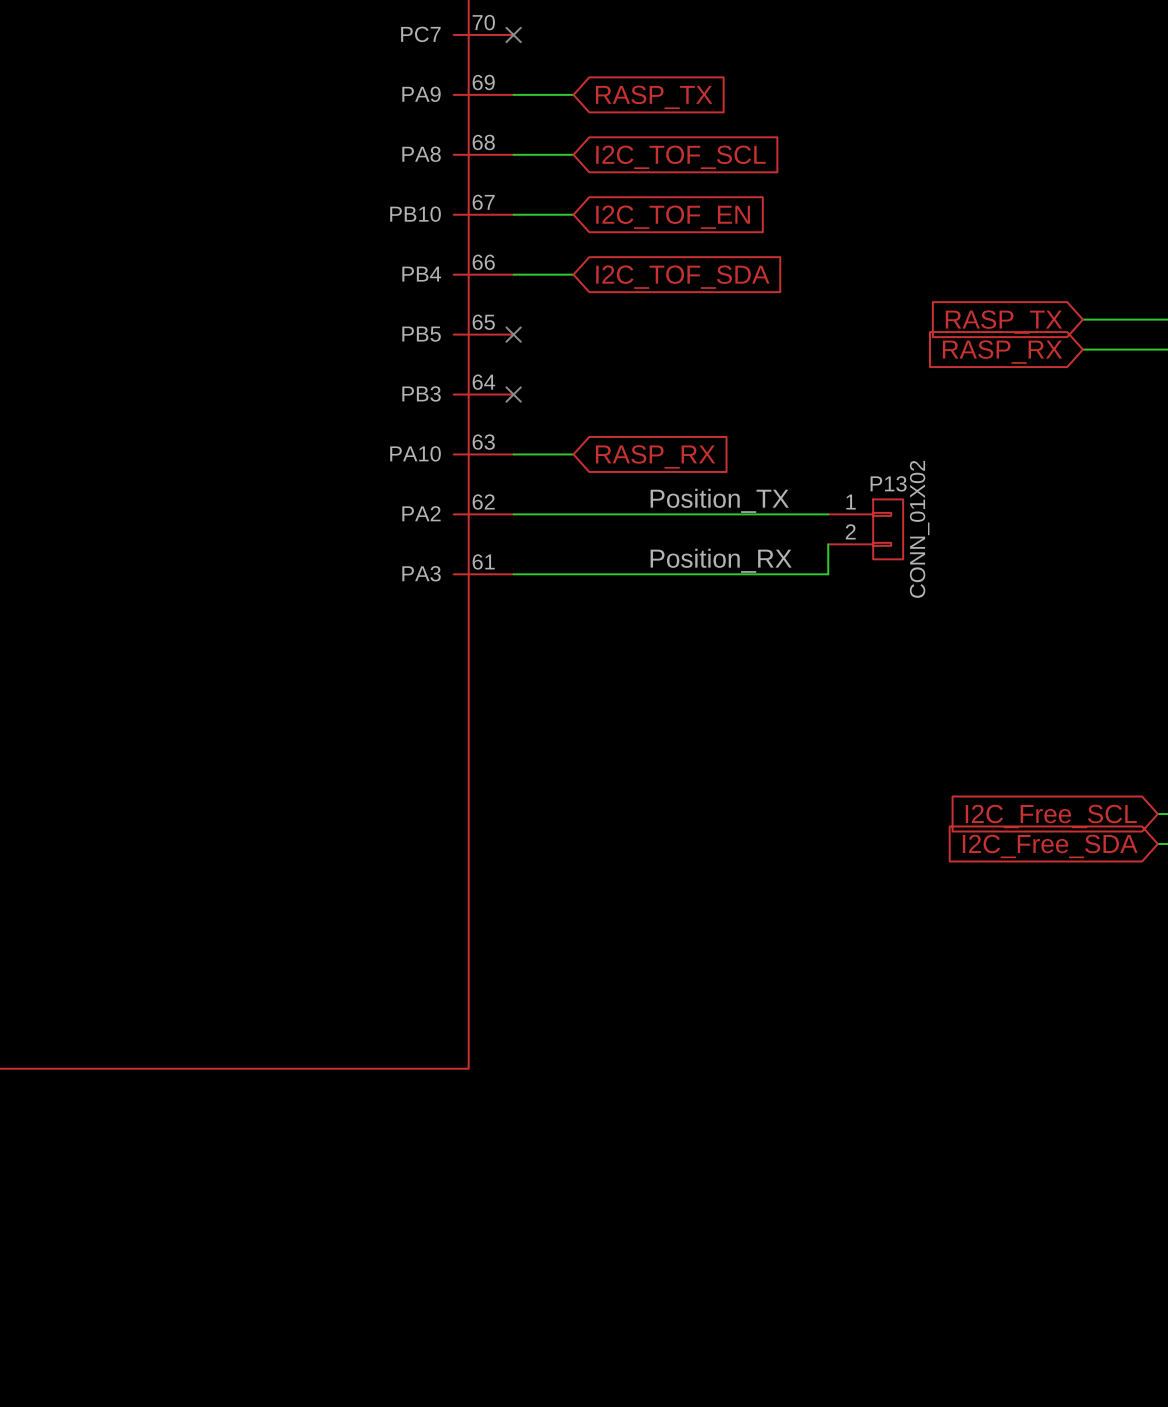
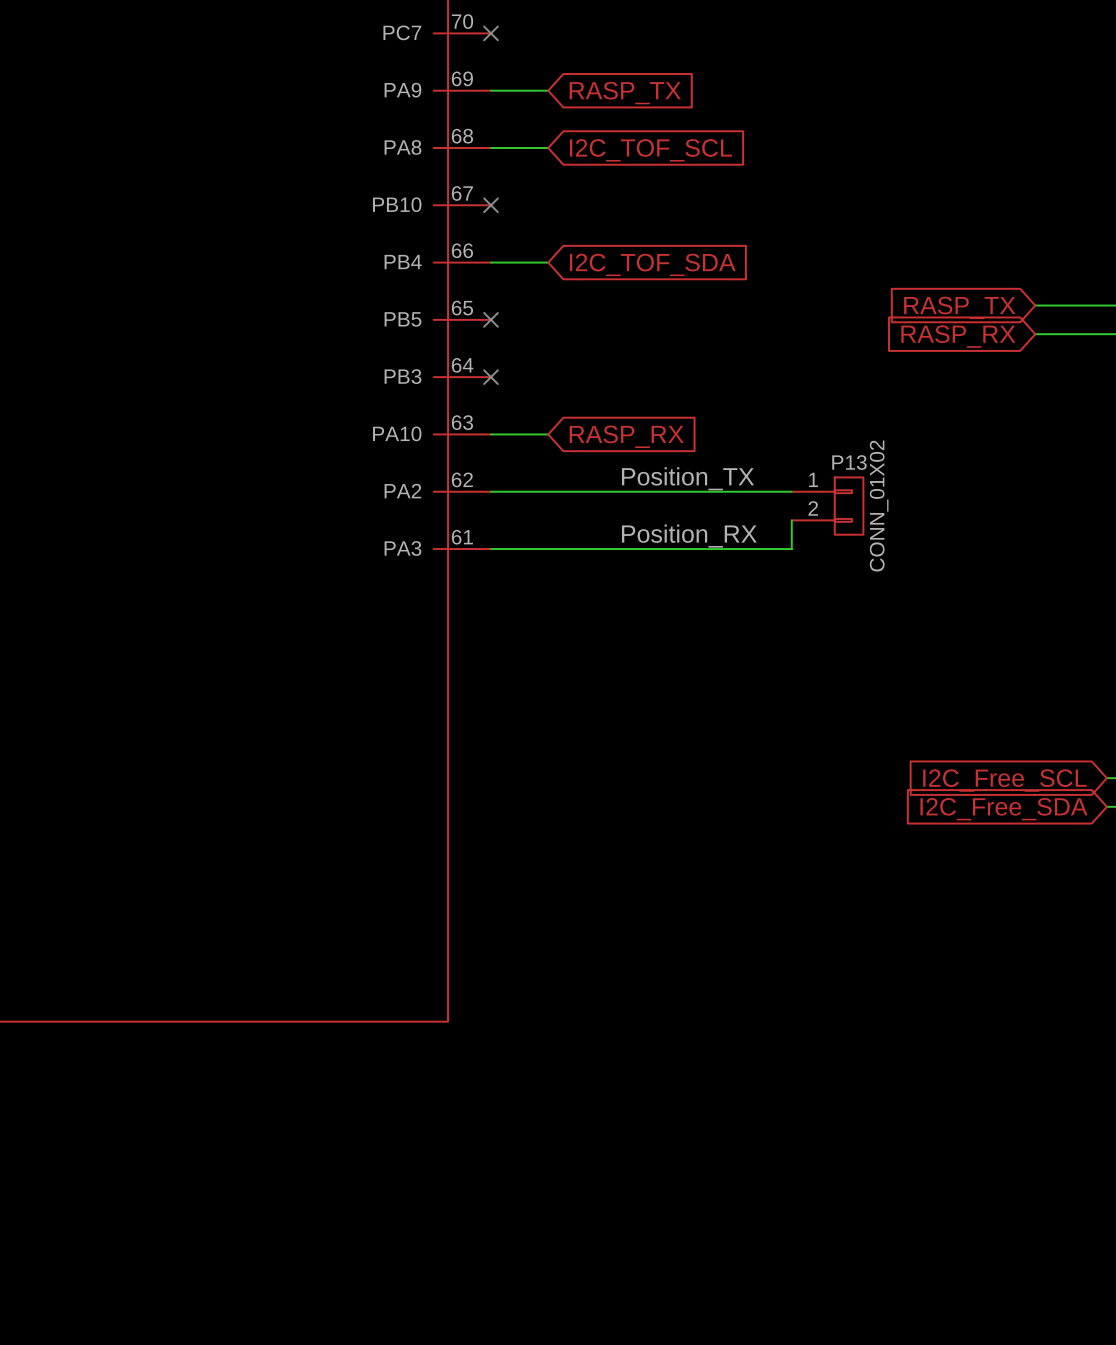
wire: (513, 214) (573, 214) -> none
no-connect mark: none -> (491, 205)
global label: I2C_TOF_EN (673, 217) -> none

